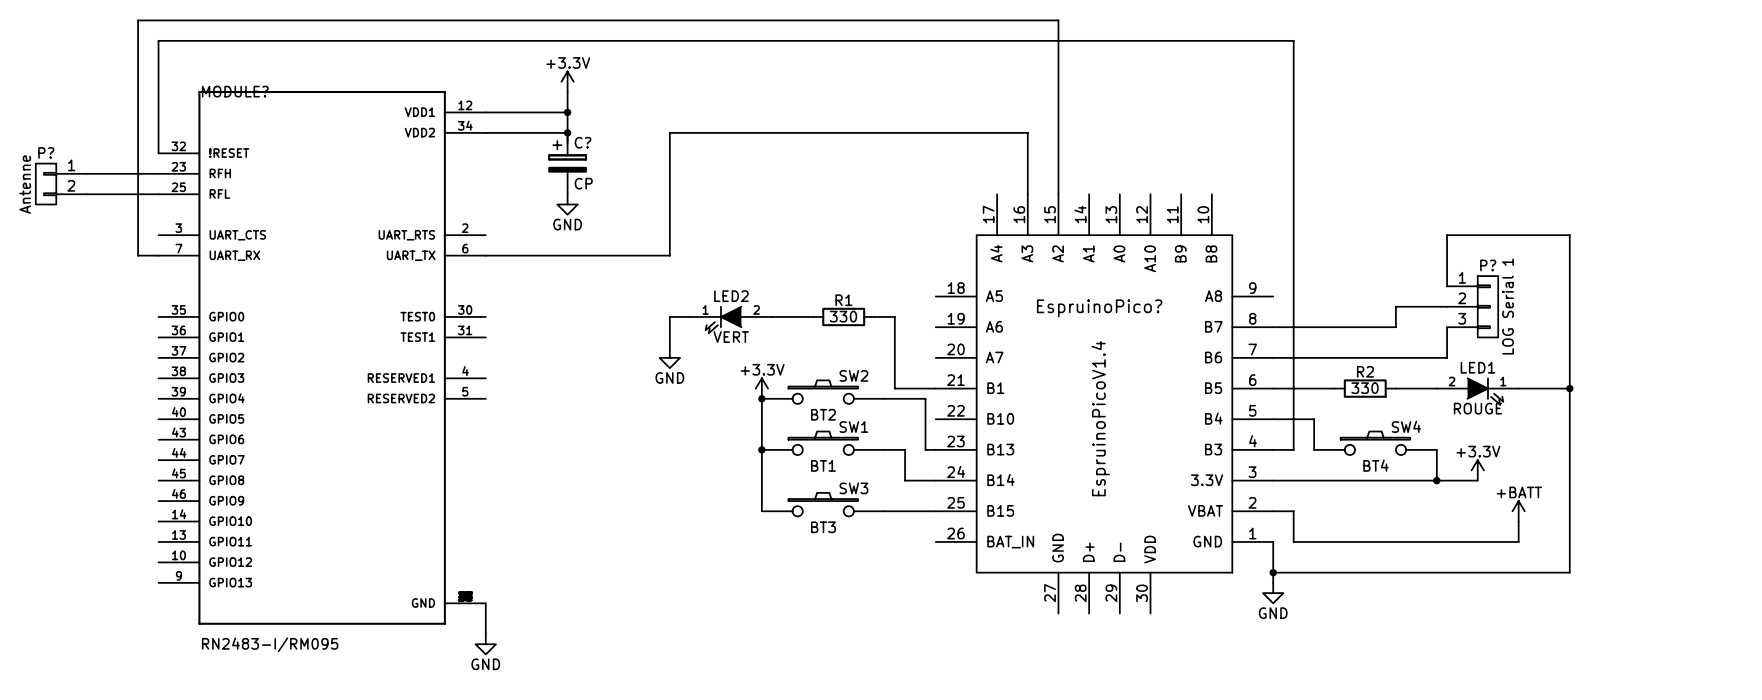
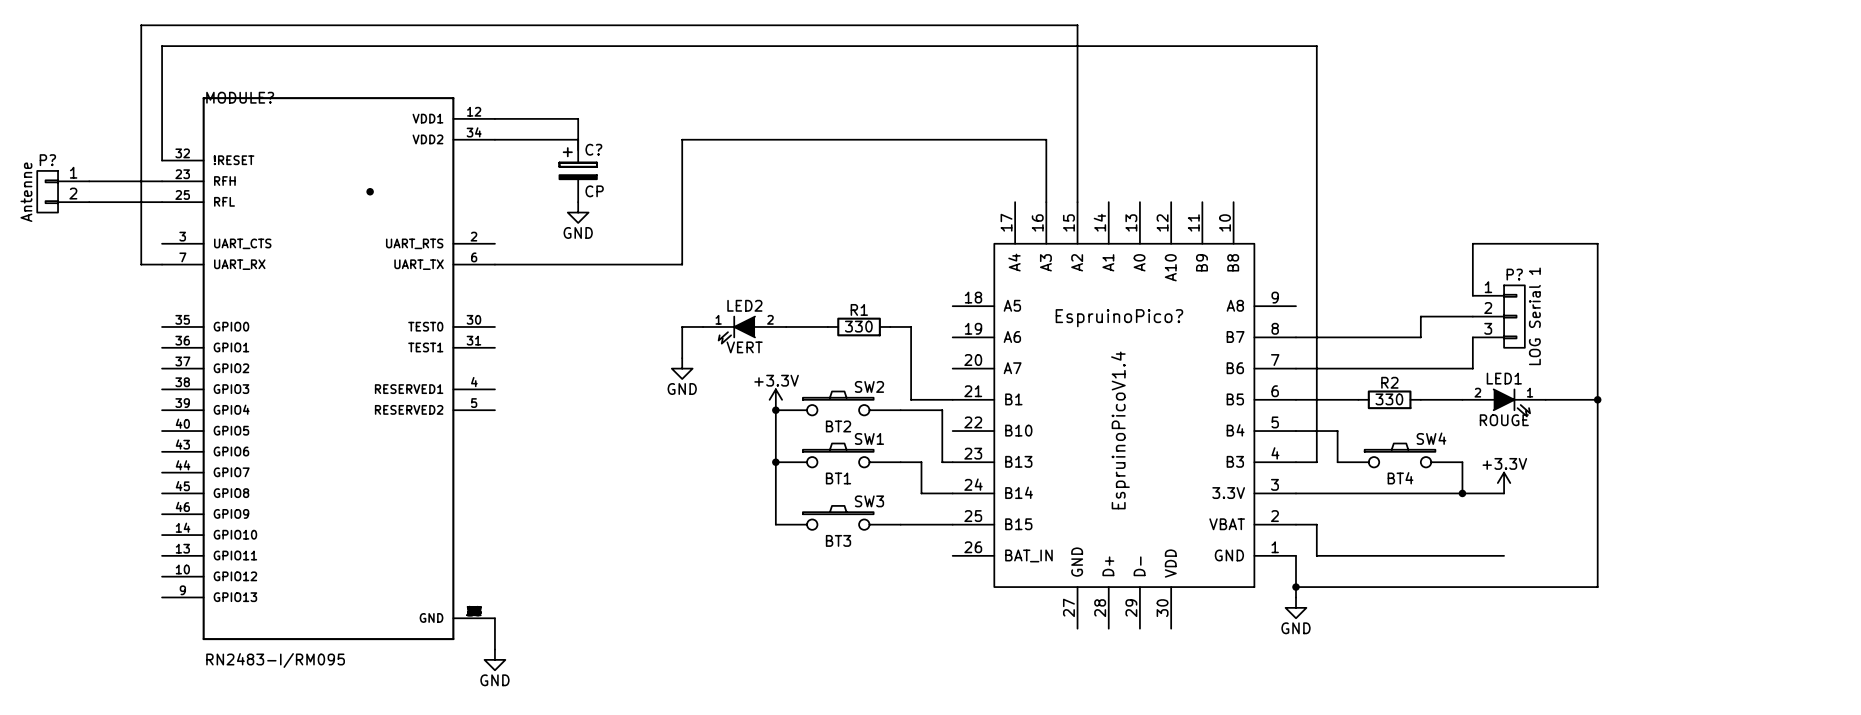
power symbol: +3.3V (567, 81) -> none
wire: (567, 92) (567, 112) -> none
junction: (567, 112) -> none
junction: (567, 132) -> none
junction: none -> (370, 191)
power symbol: +BATT (1518, 511) -> none
wire: (1518, 521) (1518, 541) (1477, 541) -> none

